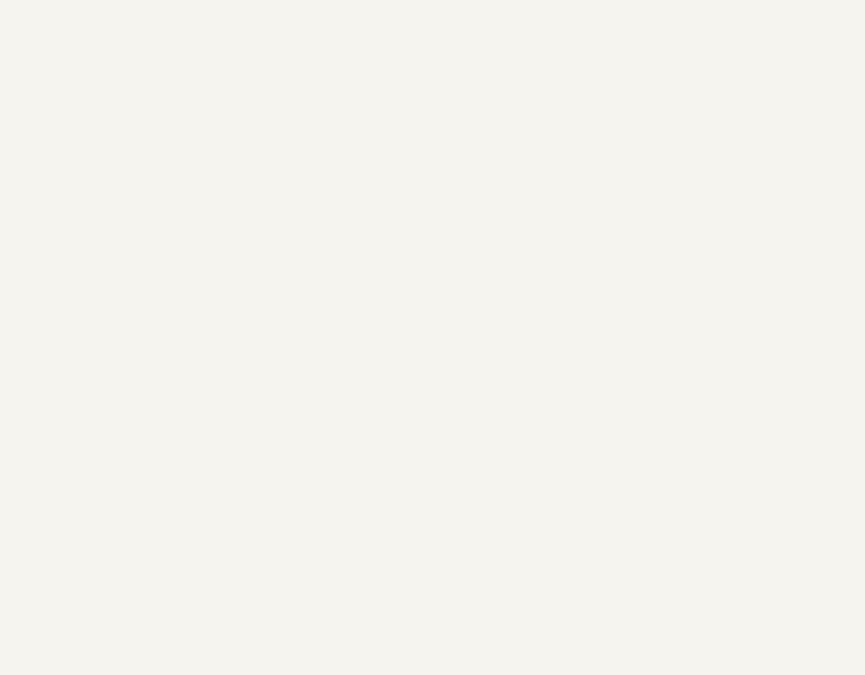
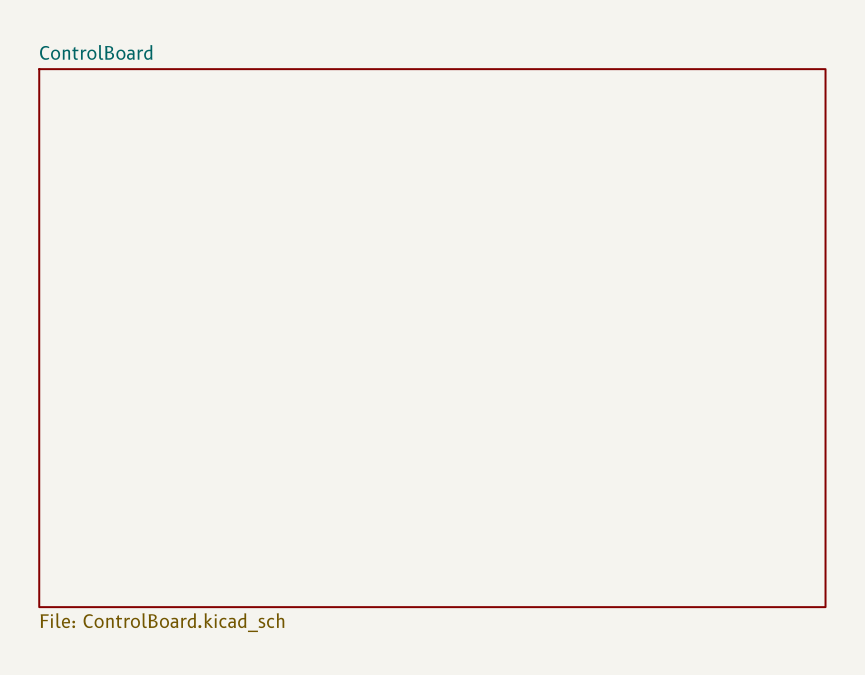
sheet ControlBoard: none -> File: ControlBoard.kicad_sch (432, 338)

